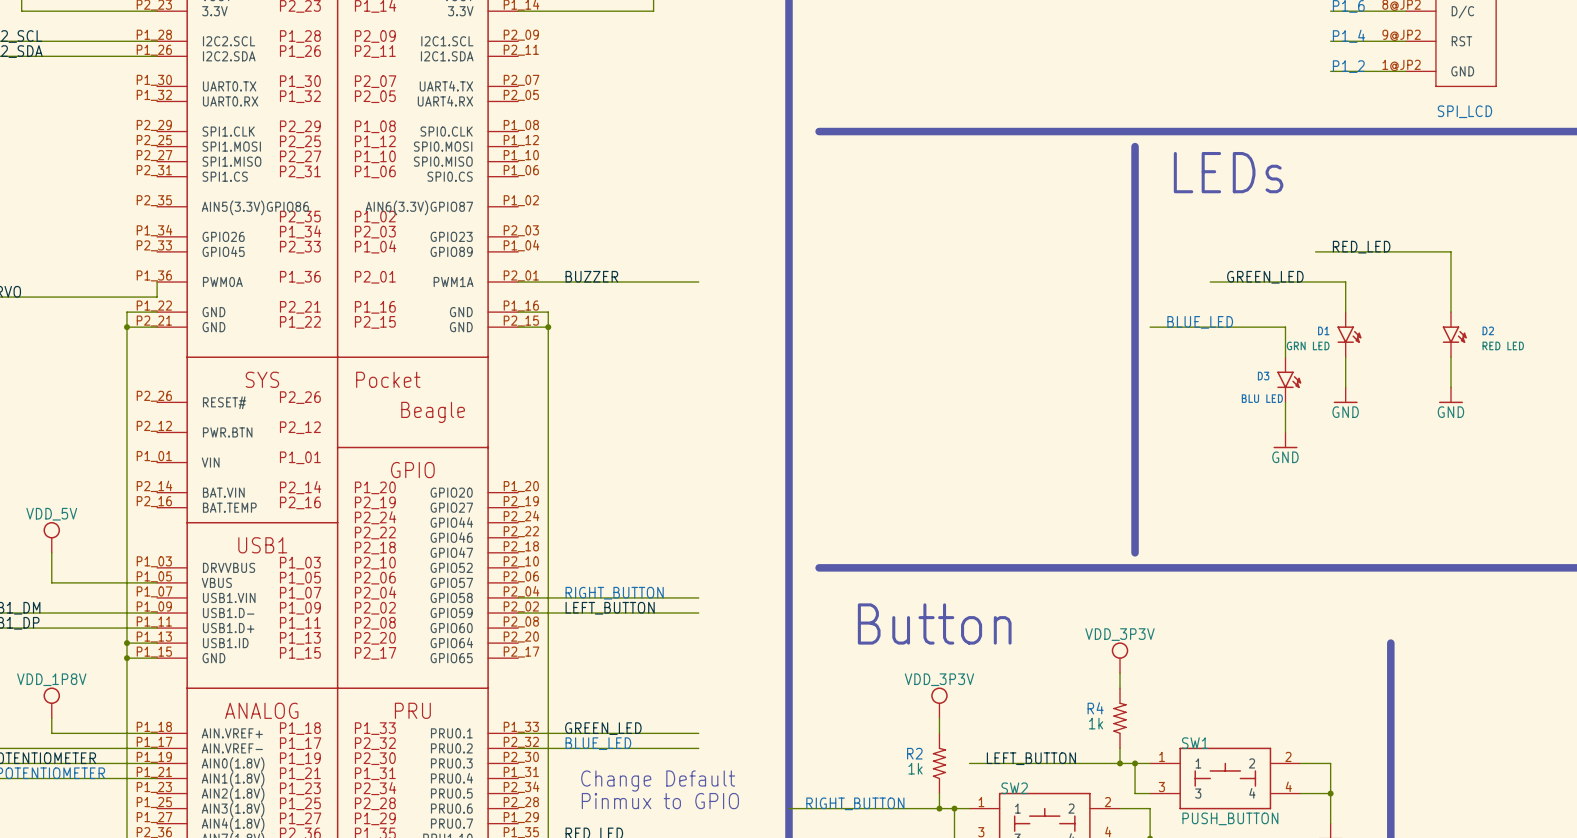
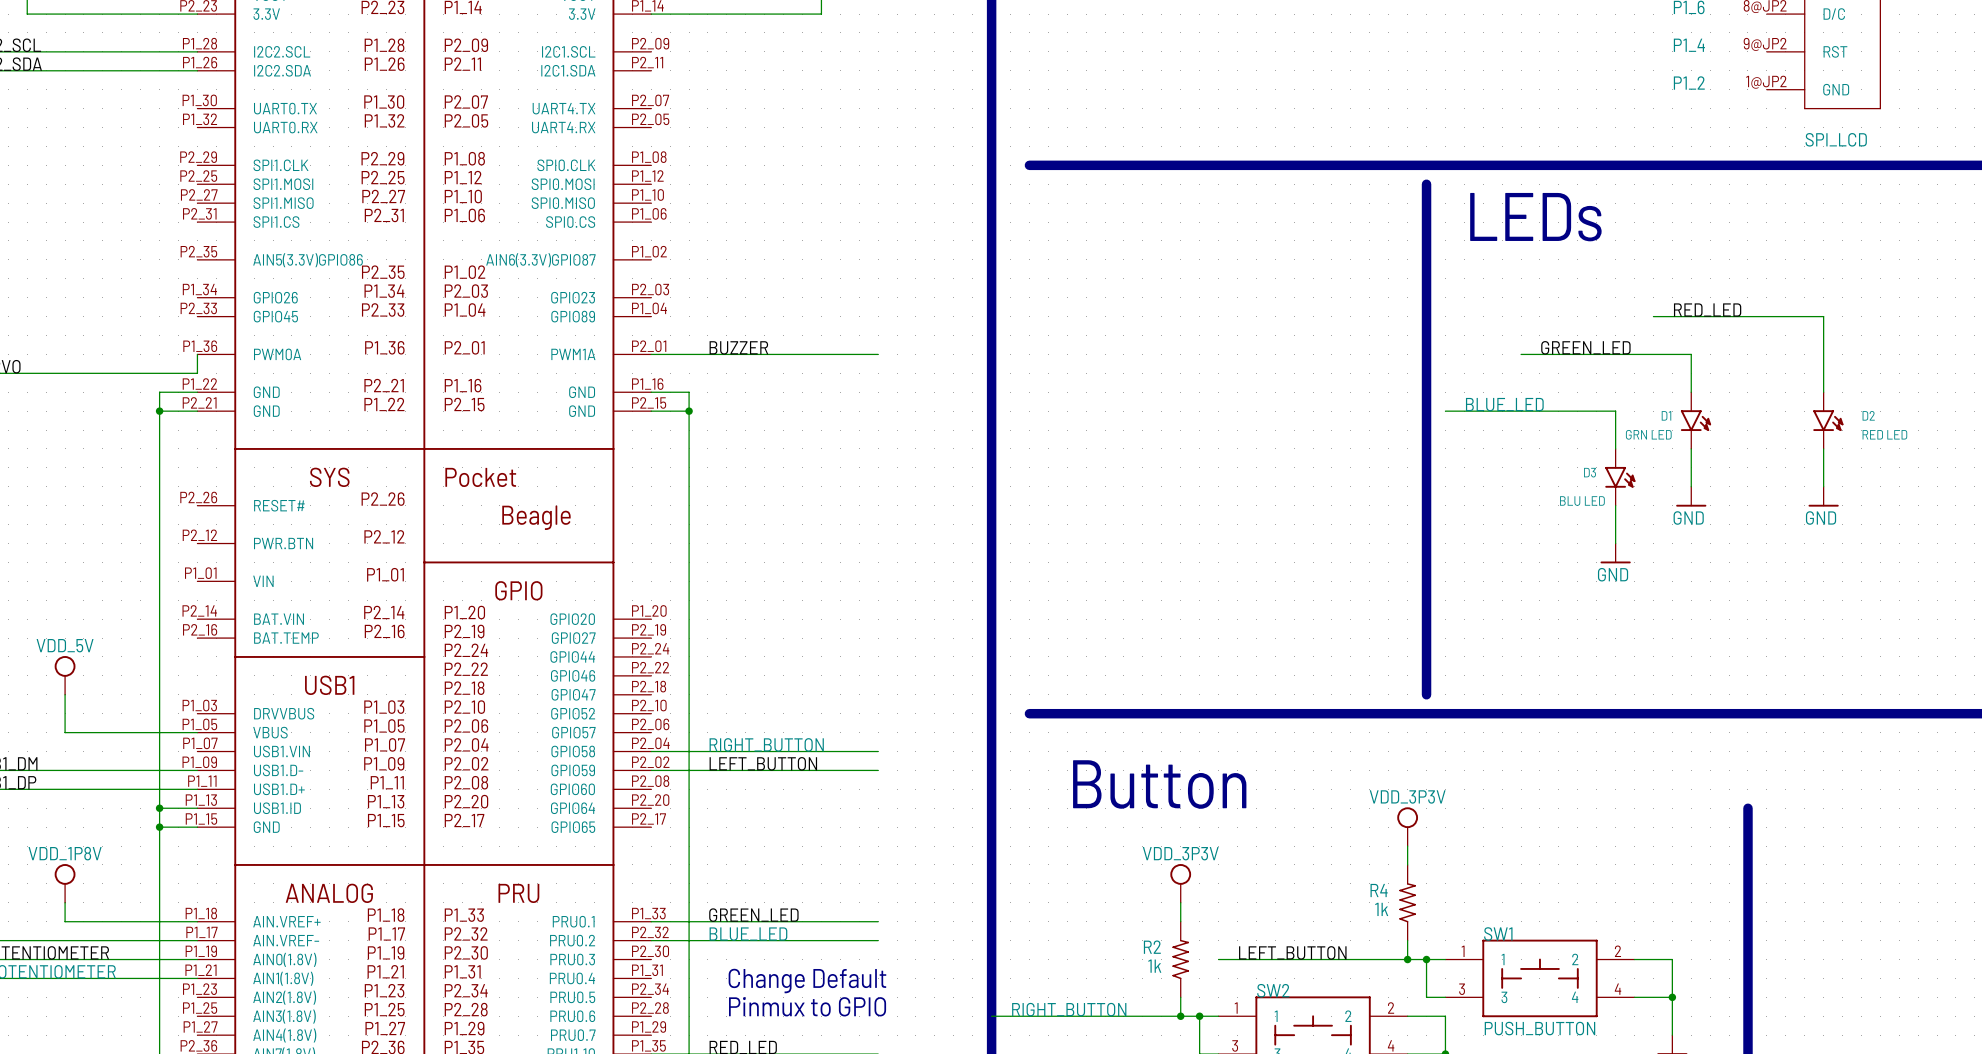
wire: (1330, 11) (1405, 11) -> none
wire: (1330, 41) (1405, 41) -> none
wire: (1330, 71) (1405, 71) -> none

